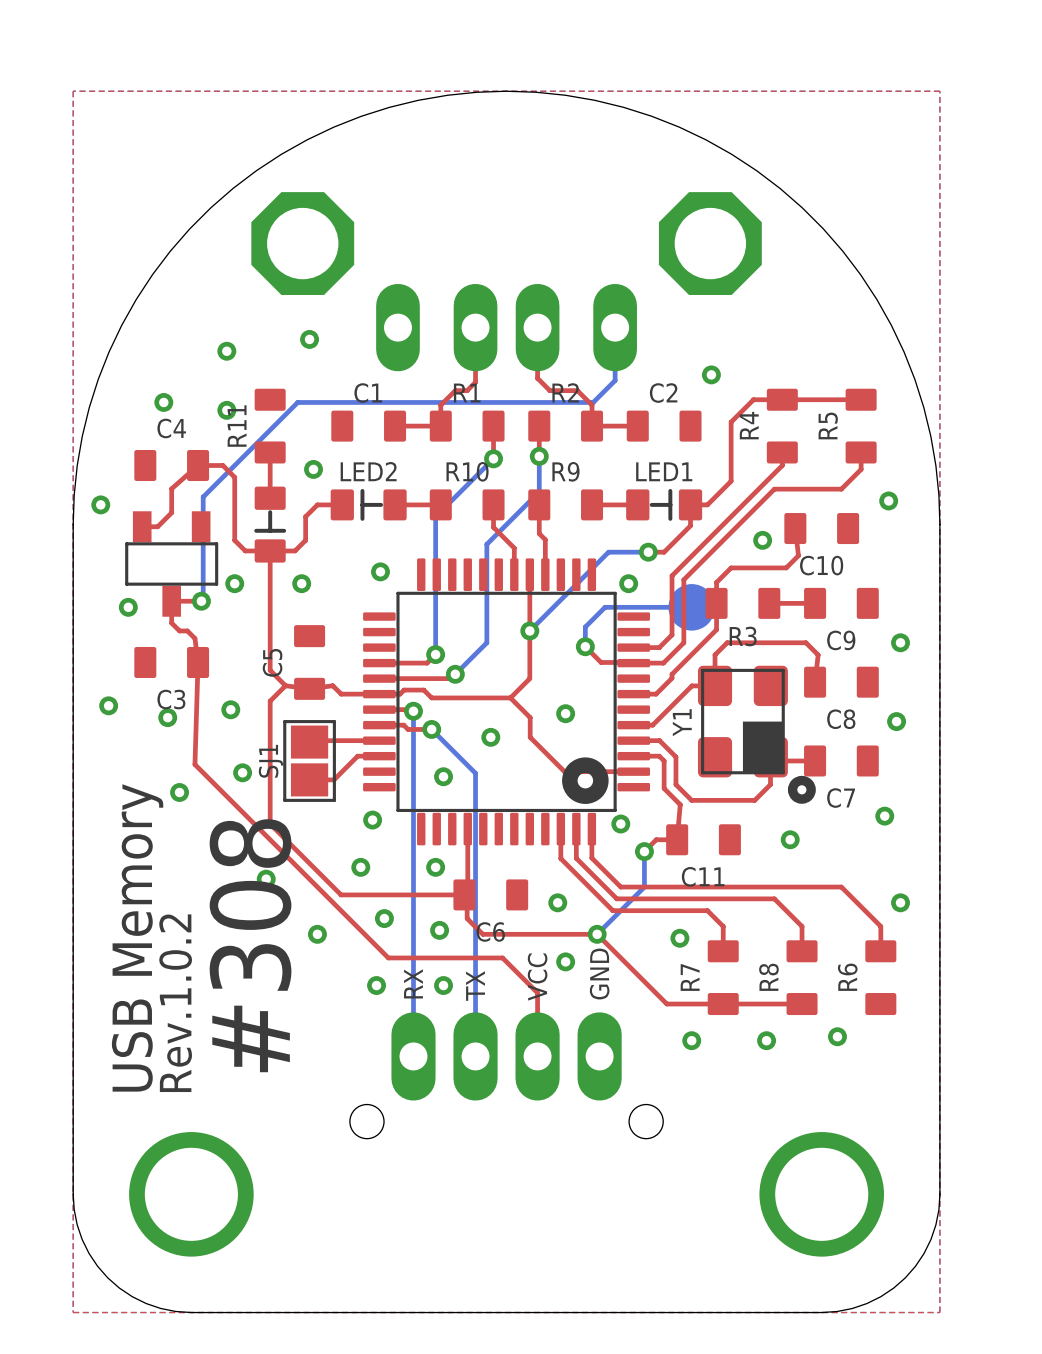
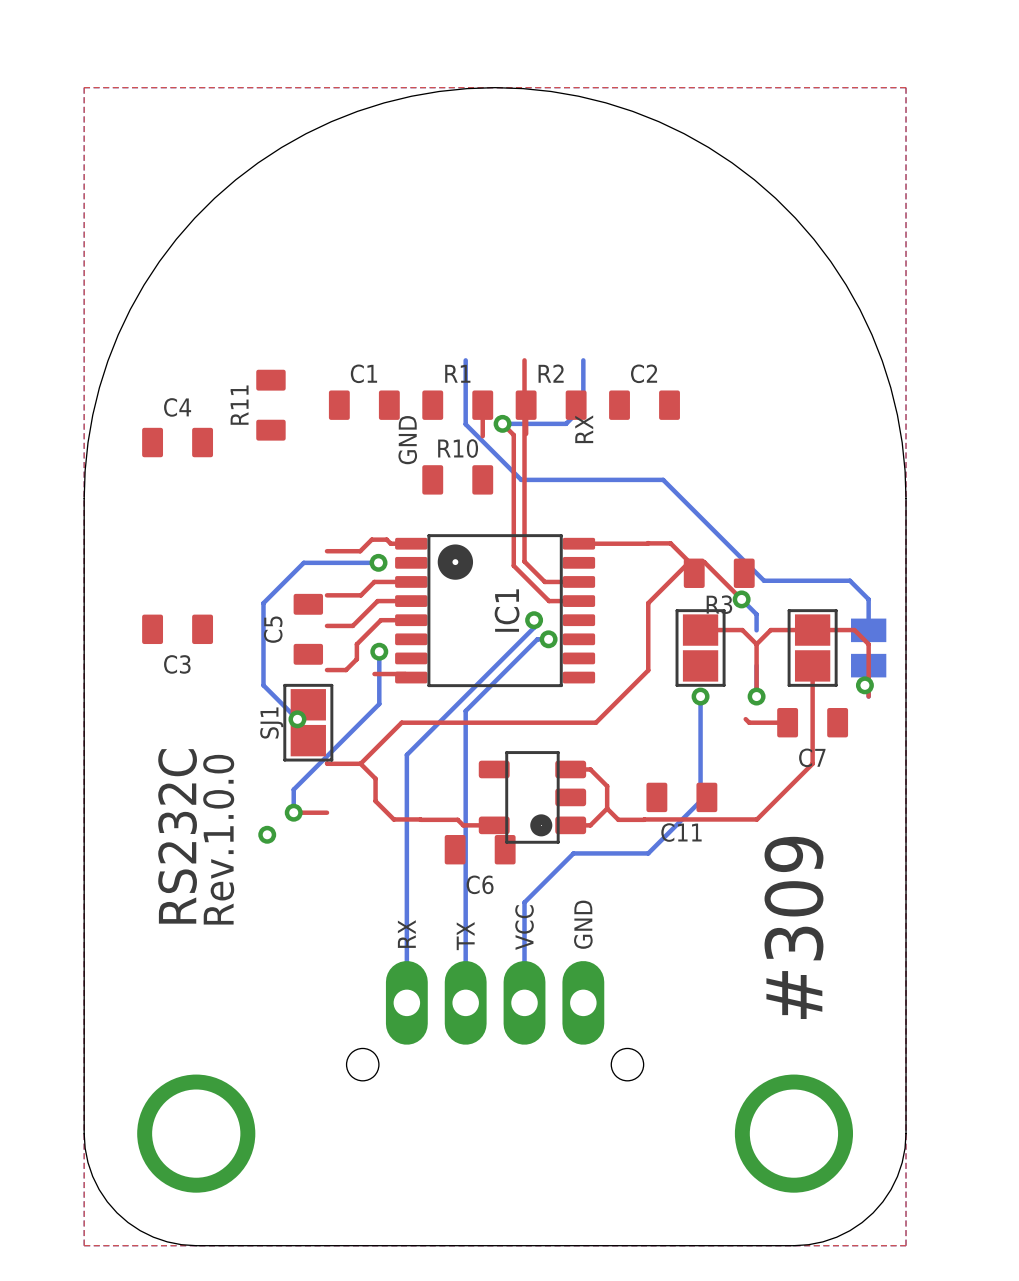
part: (506, 281) -> none
top track: (475, 327) (475, 382) (467, 390) (455, 390) (440, 405) (440, 426) (395, 426) -> none
top track: (537, 327) (537, 378) (549, 390) (577, 390) (592, 405) (592, 426) (637, 426) -> none
bottom track: (615, 327) (615, 380) (593, 402) (297, 402) (203, 497) (203, 599) (201, 601) -> none
via: (309, 339) -> none
via: (226, 351) -> none
via: (711, 374) -> none
bottom track: none -> (465, 360) (465, 424) (521, 479) (663, 479) (764, 580) (849, 580) (868, 599) (868, 630)
top track: none -> (524, 360) (524, 561) (544, 581) (578, 581)
bottom track: none -> (583, 360) (583, 406) (566, 423) (502, 423)
top track: (861, 399) (753, 399) (731, 422) (731, 481) (707, 504) (690, 504) (690, 525) (664, 552) (648, 552) -> none
via: (163, 402) -> none
via: (226, 410) -> none
R4: (782, 426) -> none
R5: (861, 426) -> none
top track: none -> (502, 423) (513, 435) (513, 565) (549, 601) (578, 601)
via: none -> (502, 423)
text: none -> RX (584, 429)
top track: (270, 452) (270, 498) -> none
top track: (782, 452) (782, 465) (672, 575) (672, 634) (659, 647) (633, 647) -> none
top track: (861, 452) (861, 469) (841, 489) (774, 489) (683, 579) (683, 642) (663, 663) (601, 662) (585, 646) -> none
bottom track: (539, 456) (539, 491) (486, 544) (486, 642) (455, 674) -> none
via: (539, 456) -> none
bottom track: (493, 458) (435, 516) (435, 654) -> none
via: (493, 458) -> none
text: none -> GND (407, 440)
via: (313, 469) -> none
via: (888, 500) -> none
via: (100, 504) -> none
top track: (342, 504) (317, 504) (305, 516) (305, 540) (295, 550) (245, 550) (234, 540) (234, 477) (222, 465) (198, 465) (171, 488) (171, 512) (157, 526) (142, 526) -> none
LED2: (368, 504) -> none
top track: (395, 504) (440, 504) -> none
top track: (493, 504) (493, 527) (514, 548) (514, 574) -> none
top track: (539, 504) (539, 533) (545, 539) (545, 574) -> none
R9: (565, 504) -> none
top track: (592, 504) (637, 504) -> none
LED1: (664, 504) -> none
part: (270, 524) -> none
top track: (795, 528) (798, 555) (786, 567) (731, 567) (716, 582) (716, 629) (672, 674) (672, 678) (656, 694) (633, 694) -> none
C10: (821, 528) -> none
via: (762, 540) -> none
top track: (270, 550) (270, 670) (285, 685) -> none
bottom track: (648, 552) (608, 552) (529, 630) -> none
via: (648, 552) -> none
part: (171, 563) -> none
via position: (380, 571) -> (378, 562)
top track: none -> (648, 543) (578, 543)
top track: none -> (648, 543) (670, 543) (689, 562)
top track: none -> (411, 543) (390, 543) (386, 539) (371, 539) (360, 551) (326, 551)
top track: (529, 574) (529, 678) (510, 697) -> none
via: (234, 583) -> none
via: (301, 583) -> none
via: (628, 583) -> none
top track: none -> (689, 562) (648, 603) (648, 670) (595, 722) (401, 722) (360, 763)
top track: none -> (689, 562) (704, 562) (741, 599)
bottom track: none -> (378, 562) (303, 562) (263, 603) (263, 685) (297, 719)
top track: (201, 601) (171, 601) (171, 623) (179, 630) (187, 630) (194, 638) (198, 662) (194, 764) (388, 957) (502, 957) (537, 992) (537, 1056) -> none
via: (201, 601) -> none
top track: (769, 603) (815, 603) -> none
C9: (841, 603) -> none
via: (128, 607) -> none
bottom track: (691, 607) (605, 607) (585, 627) (585, 646) -> none
part: (691, 607) -> none
top track: none -> (411, 581) (374, 581) (360, 595) (326, 595)
via: (529, 630) -> none
bottom track: none -> (741, 599) (756, 614) (756, 630)
via: none -> (741, 599)
top track: none -> (411, 601) (377, 601) (352, 625) (326, 625)
IC1: none -> (495, 610)
via: (900, 642) -> none
via: (585, 646) -> none
top track: none -> (411, 620) (380, 620) (356, 644) (356, 659) (346, 670) (326, 670)
via: none -> (534, 620)
top track: (435, 654) (427, 663) (379, 663) -> none
via: (435, 654) -> none
top track: none -> (700, 630) (742, 630) (756, 644)
via: none -> (548, 639)
top track: (455, 674) (451, 678) (379, 678) -> none
via: (455, 674) -> none
top track: none -> (756, 644) (756, 696)
top track: none -> (756, 644) (770, 630) (854, 630) (868, 644) (868, 696)
part: none -> (700, 647)
top track: (815, 682) (818, 654) (805, 642) (727, 642) (715, 654) (715, 685) (691, 685) (652, 725) (633, 725) -> none
C8: (841, 682) -> none
part: none -> (812, 647)
part: none -> (868, 647)
top track: (285, 685) (309, 688) (332, 685) (341, 694) (400, 694) (404, 690) (423, 690) (431, 697) (510, 697) -> none
top track: (285, 685) (270, 701) (270, 824) (341, 894) (464, 894) -> none
bottom track: none -> (379, 651) (379, 704) (293, 789) (293, 812)
via: none -> (379, 651)
top track: (510, 697) (530, 717) (530, 737) (564, 771) (633, 771) -> none
part: (506, 701) -> none
top track: none -> (812, 665) (812, 763) (756, 819) (644, 819)
via: (108, 705) -> none
via: (230, 709) -> none
bottom track: (413, 711) (413, 794) -> (534, 620) (534, 627) (406, 754)
via: (413, 711) -> none
via: (565, 713) -> none
via: (167, 717) -> none
top track: (379, 725) (403, 725) (408, 729) (431, 729) -> none
bottom track: (431, 729) (475, 773) -> (548, 639) (537, 639) (465, 711) (465, 734)
via: (431, 729) -> none
bottom track: none -> (700, 696) (700, 801) (648, 853) (573, 853) (524, 902) (524, 1002)
via: none -> (700, 696)
via: none -> (756, 696)
Y1: (756, 734) -> none
via: (490, 737) -> none
top track: (379, 740) (309, 742) -> none
top track: (633, 740) (659, 740) (675, 757) (675, 784) (691, 800) (754, 800) (770, 784) (770, 757) -> none
top track: (379, 756) (357, 756) (334, 779) (309, 779) -> none
top track: (633, 756) (659, 756) (664, 760) (664, 788) (680, 804) (677, 839) (656, 839) (644, 851) -> none
via: none -> (297, 719)
via: (242, 772) -> none
via: (443, 776) -> none
via: (179, 792) -> none
top track: none -> (327, 763) (360, 763)
top track: none -> (360, 763) (375, 778) (375, 801) (393, 819) (420, 819)
top track: none -> (570, 769) (590, 769) (607, 786) (607, 808)
via: (884, 816) -> none
via: (372, 820) -> none
via: (620, 824) -> none
top track: (467, 829) (467, 894) (464, 894) -> none
top track: (560, 829) (560, 858) (612, 910) (707, 910) (723, 926) (723, 951) -> none
top track: (576, 829) (576, 858) (616, 898) (774, 898) (802, 926) (802, 951) -> none
top track: (591, 829) (591, 858) (620, 887) (841, 887) (880, 926) (880, 951) -> none
part: none -> (532, 797)
via: (790, 839) -> none
top track: none -> (607, 808) (618, 819) (644, 819)
top track: none -> (607, 808) (590, 825) (570, 825)
bottom track: (644, 851) (644, 887) (597, 934) -> none
via: (644, 851) -> none
top track: none -> (293, 812) (326, 812)
via: none -> (293, 812)
top track: none -> (420, 819) (457, 819) (463, 825) (494, 825)
via: (360, 867) -> none
via: (435, 867) -> none
text: none -> RS232C (177, 836)
top track: (464, 894) (467, 895) (467, 918) (482, 934) (597, 934) (666, 1004) (802, 1004) -> none
via: (557, 902) -> none
via: (900, 902) -> none
via: (384, 918) -> none
via: (439, 930) -> none
via: (317, 934) -> none
via: (597, 934) -> none
text: USB Memory (137, 937) -> none
via: (679, 938) -> none
text: #308 (250, 945) -> none
via: (565, 961) -> none
R7: (723, 977) -> none
R8: (802, 977) -> none
text: none -> #309 (793, 927)
R6: (880, 977) -> none
via: (376, 985) -> none
via: (443, 985) -> none
text: Rev.1.0.2 (175, 1003) -> Rev.1.0.0 (218, 839)
via: (837, 1036) -> none
via: (691, 1040) -> none
via: (766, 1040) -> none

